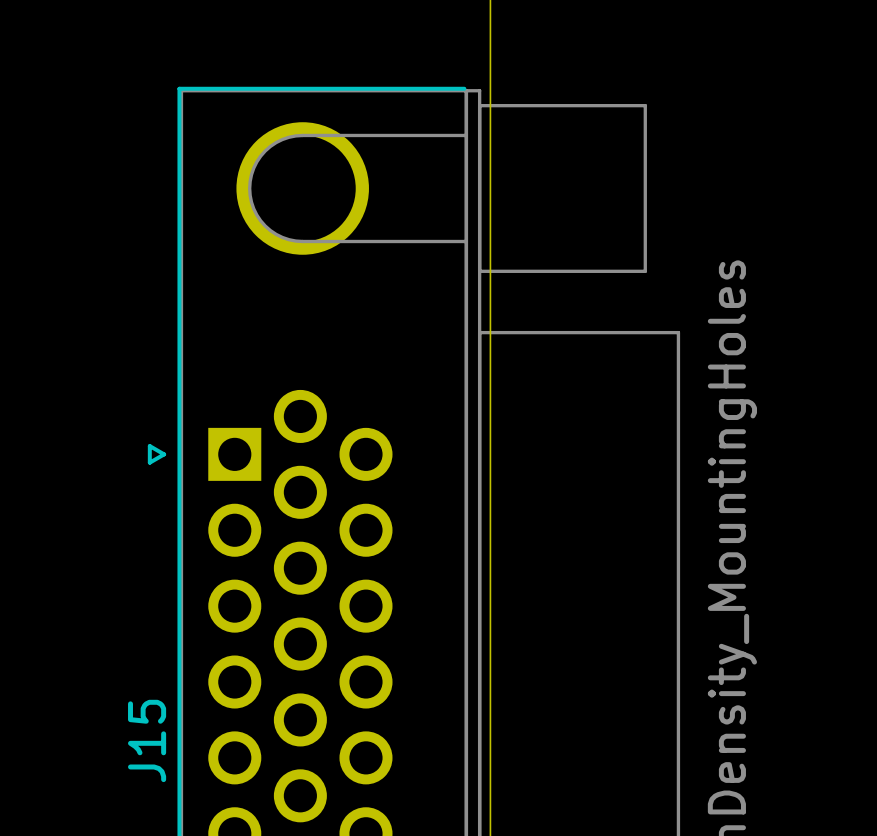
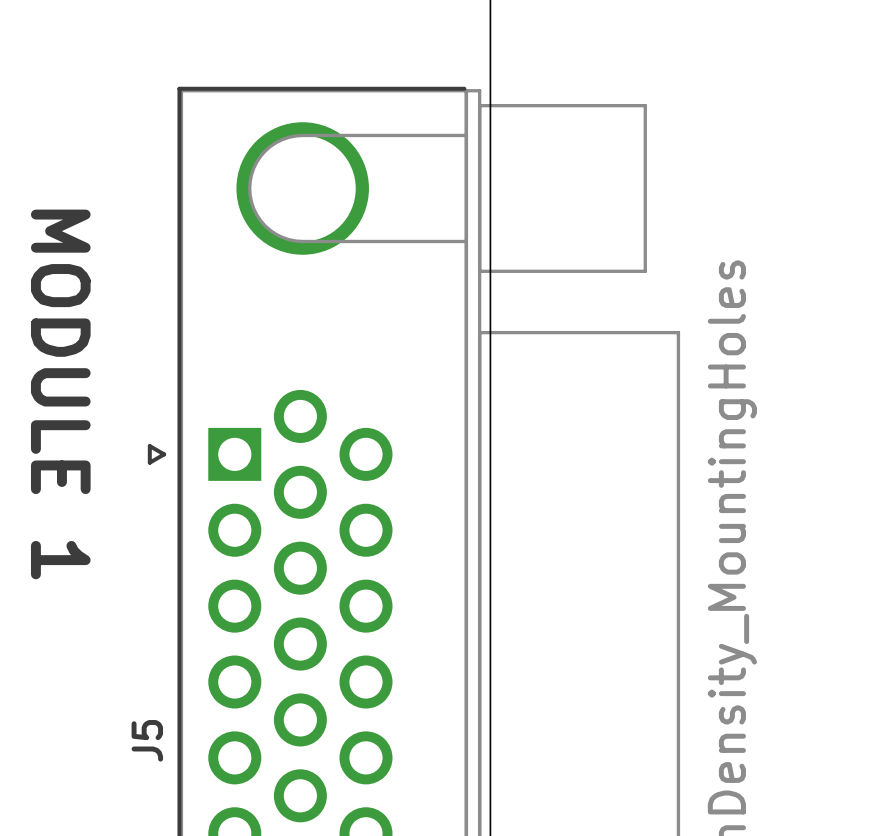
text: none -> MODULE 1 (60, 394)
J15 name: J15 (147, 740) -> J5 (147, 740)

